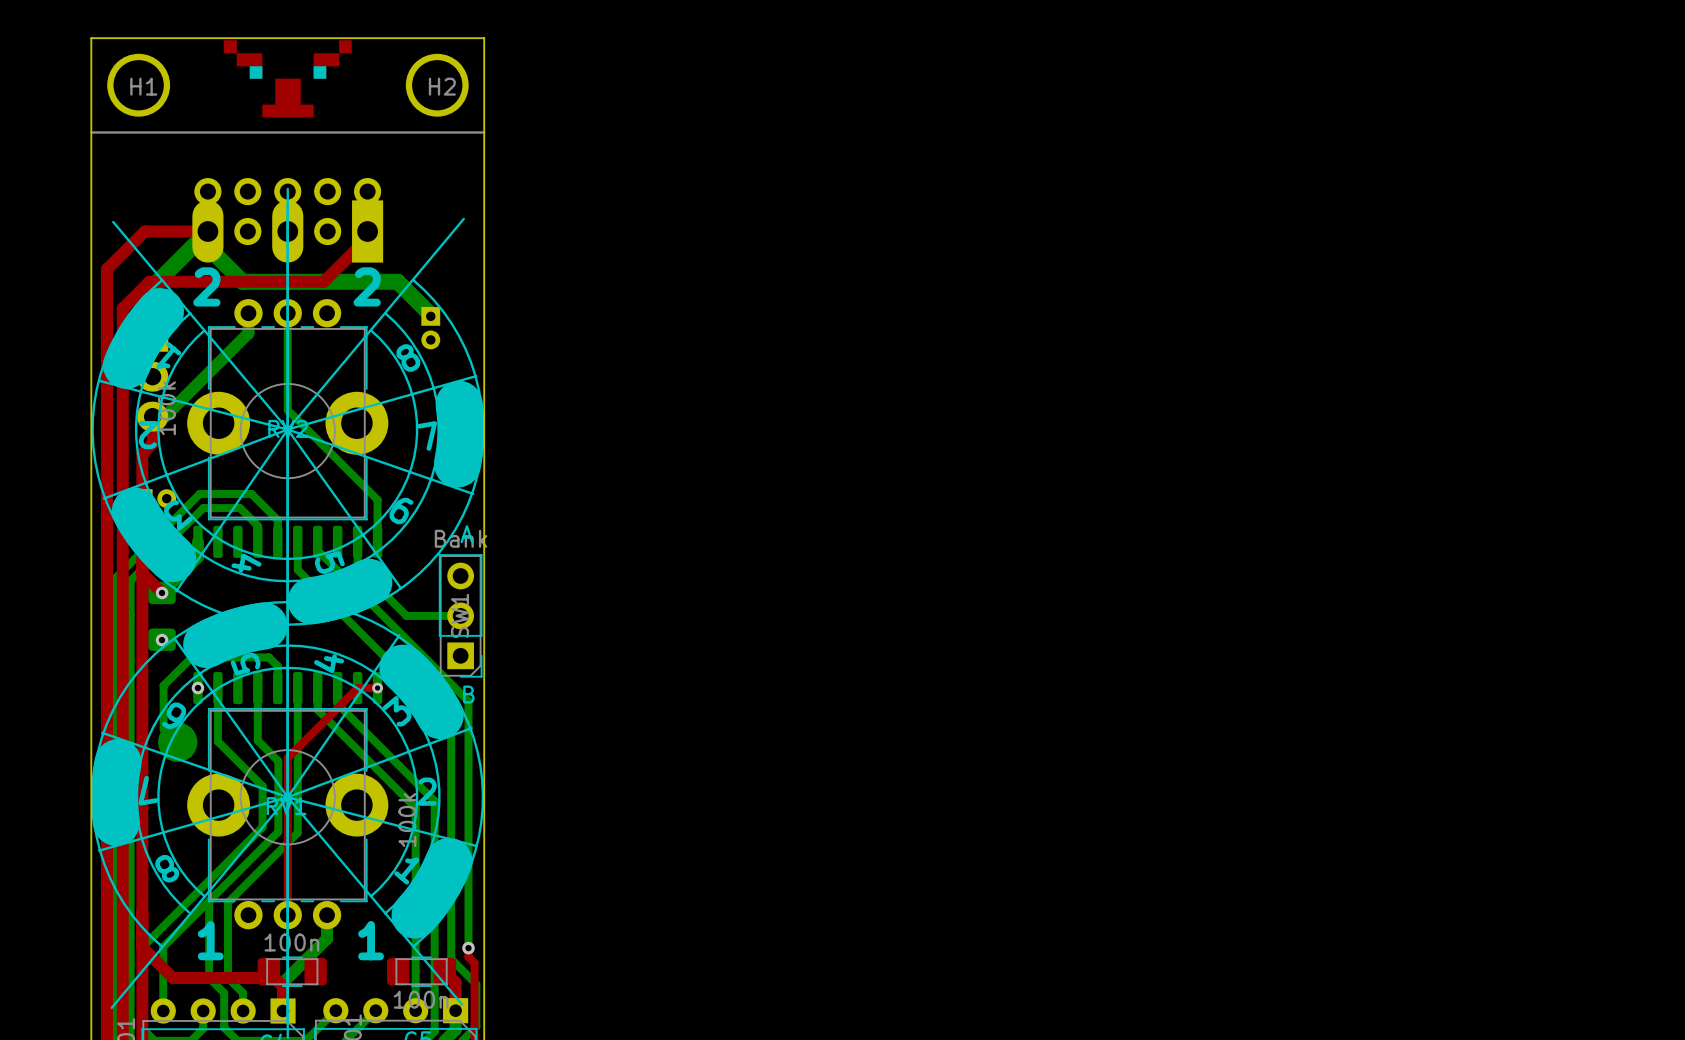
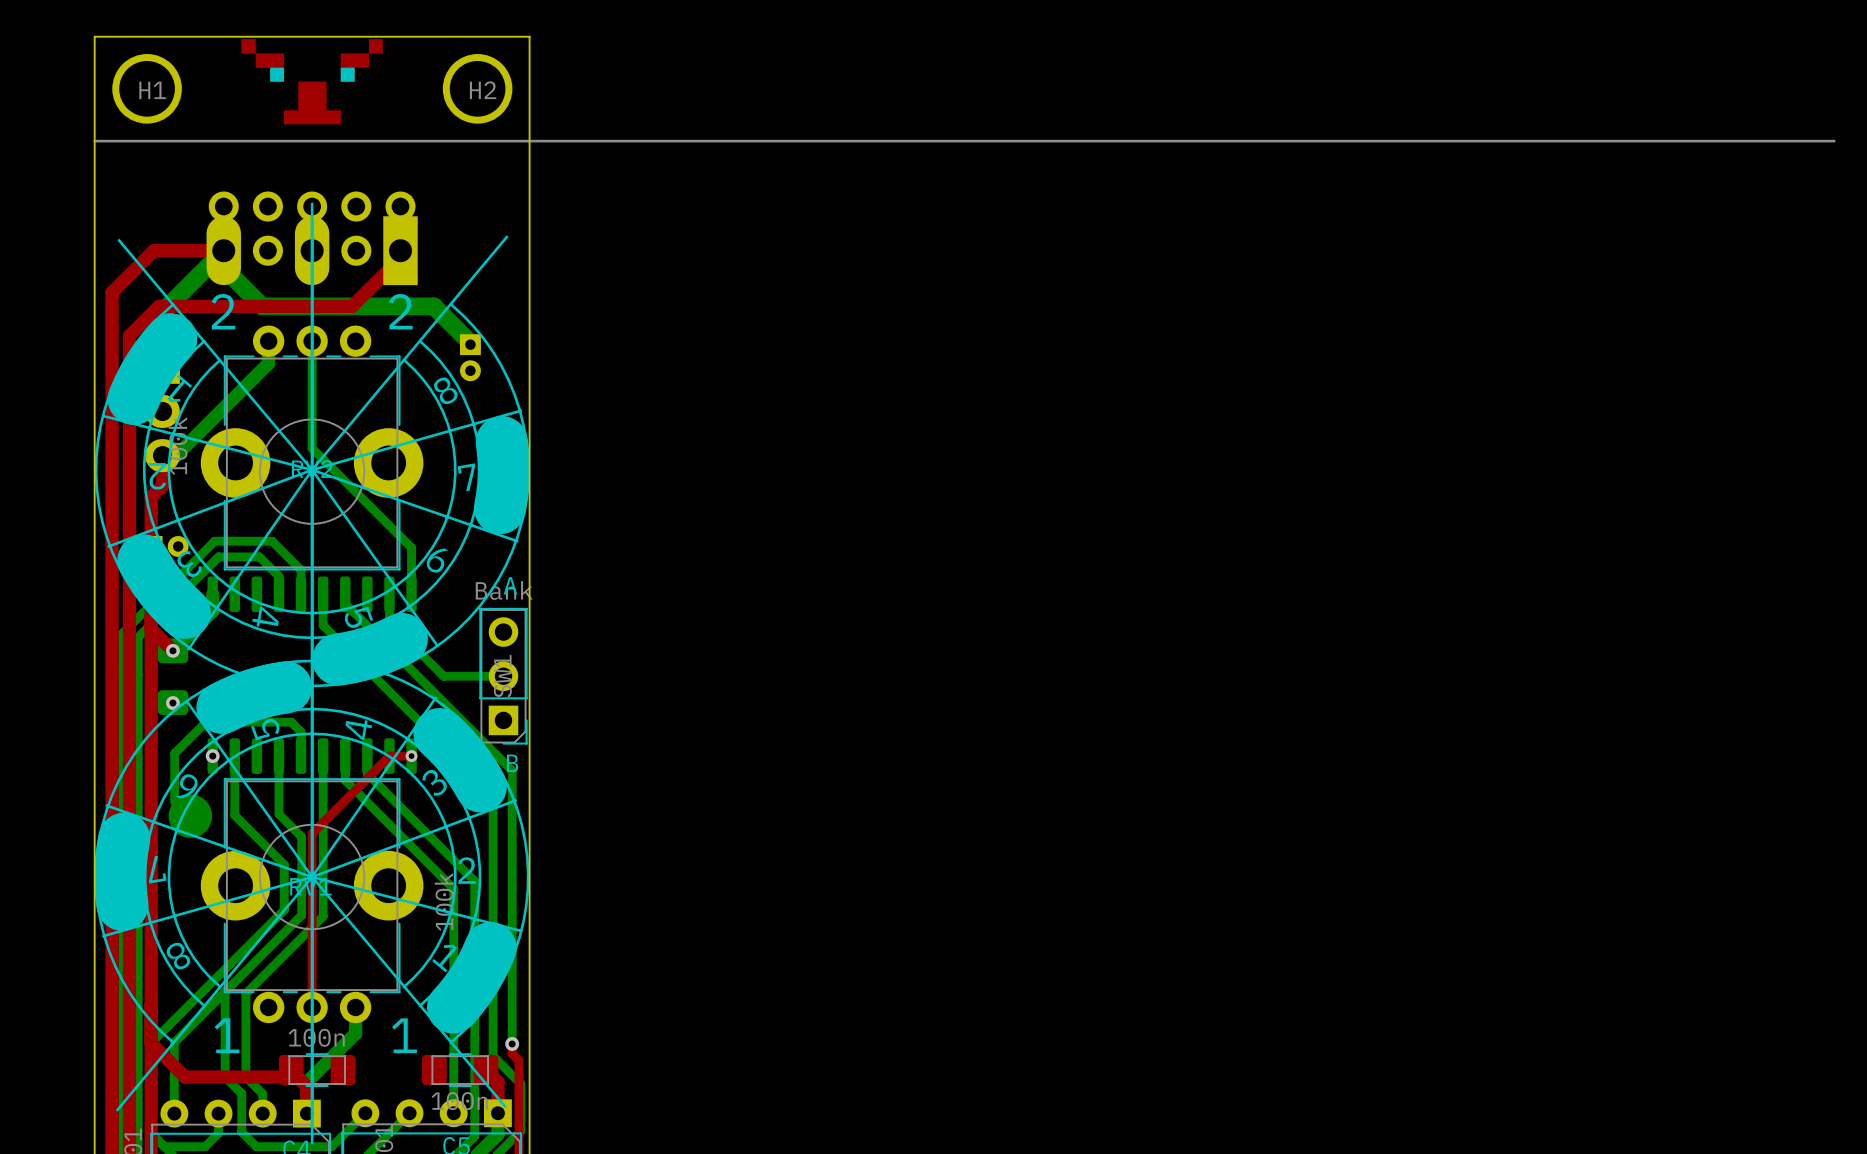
line: none -> (529, 141) (1834, 141)

